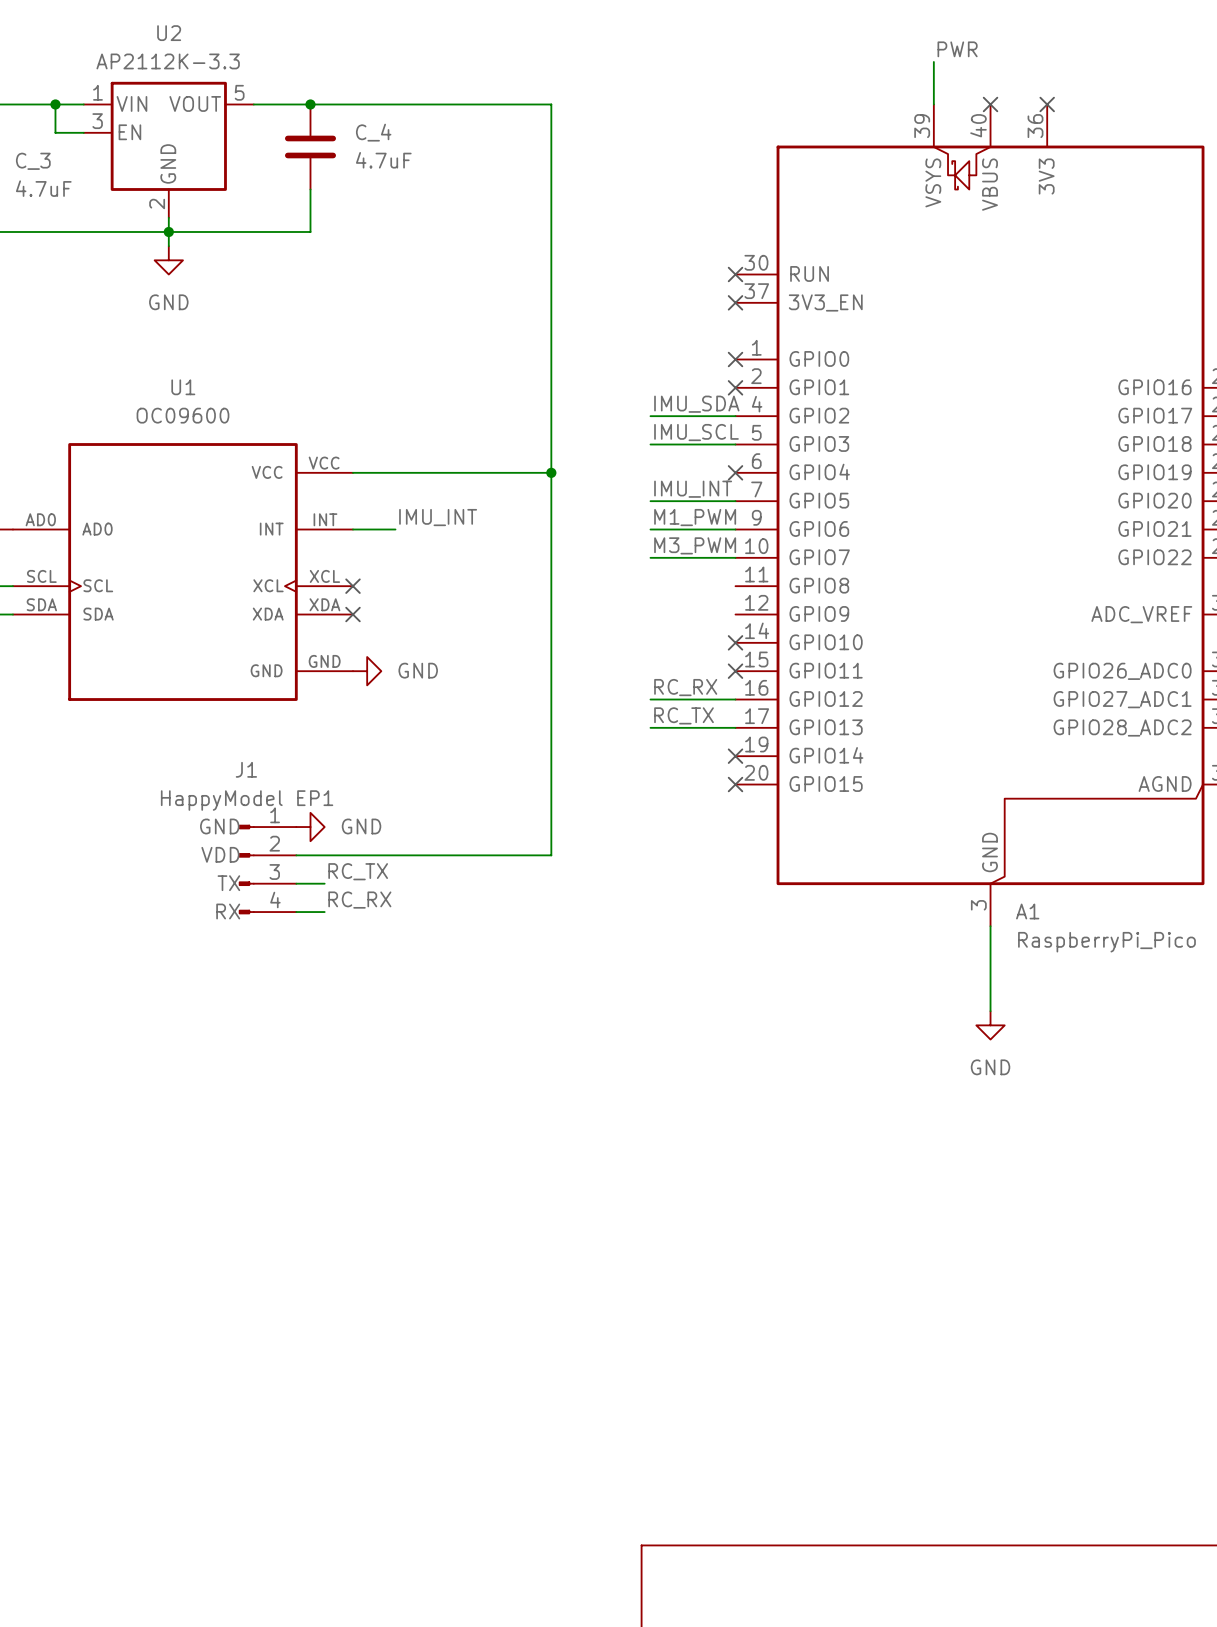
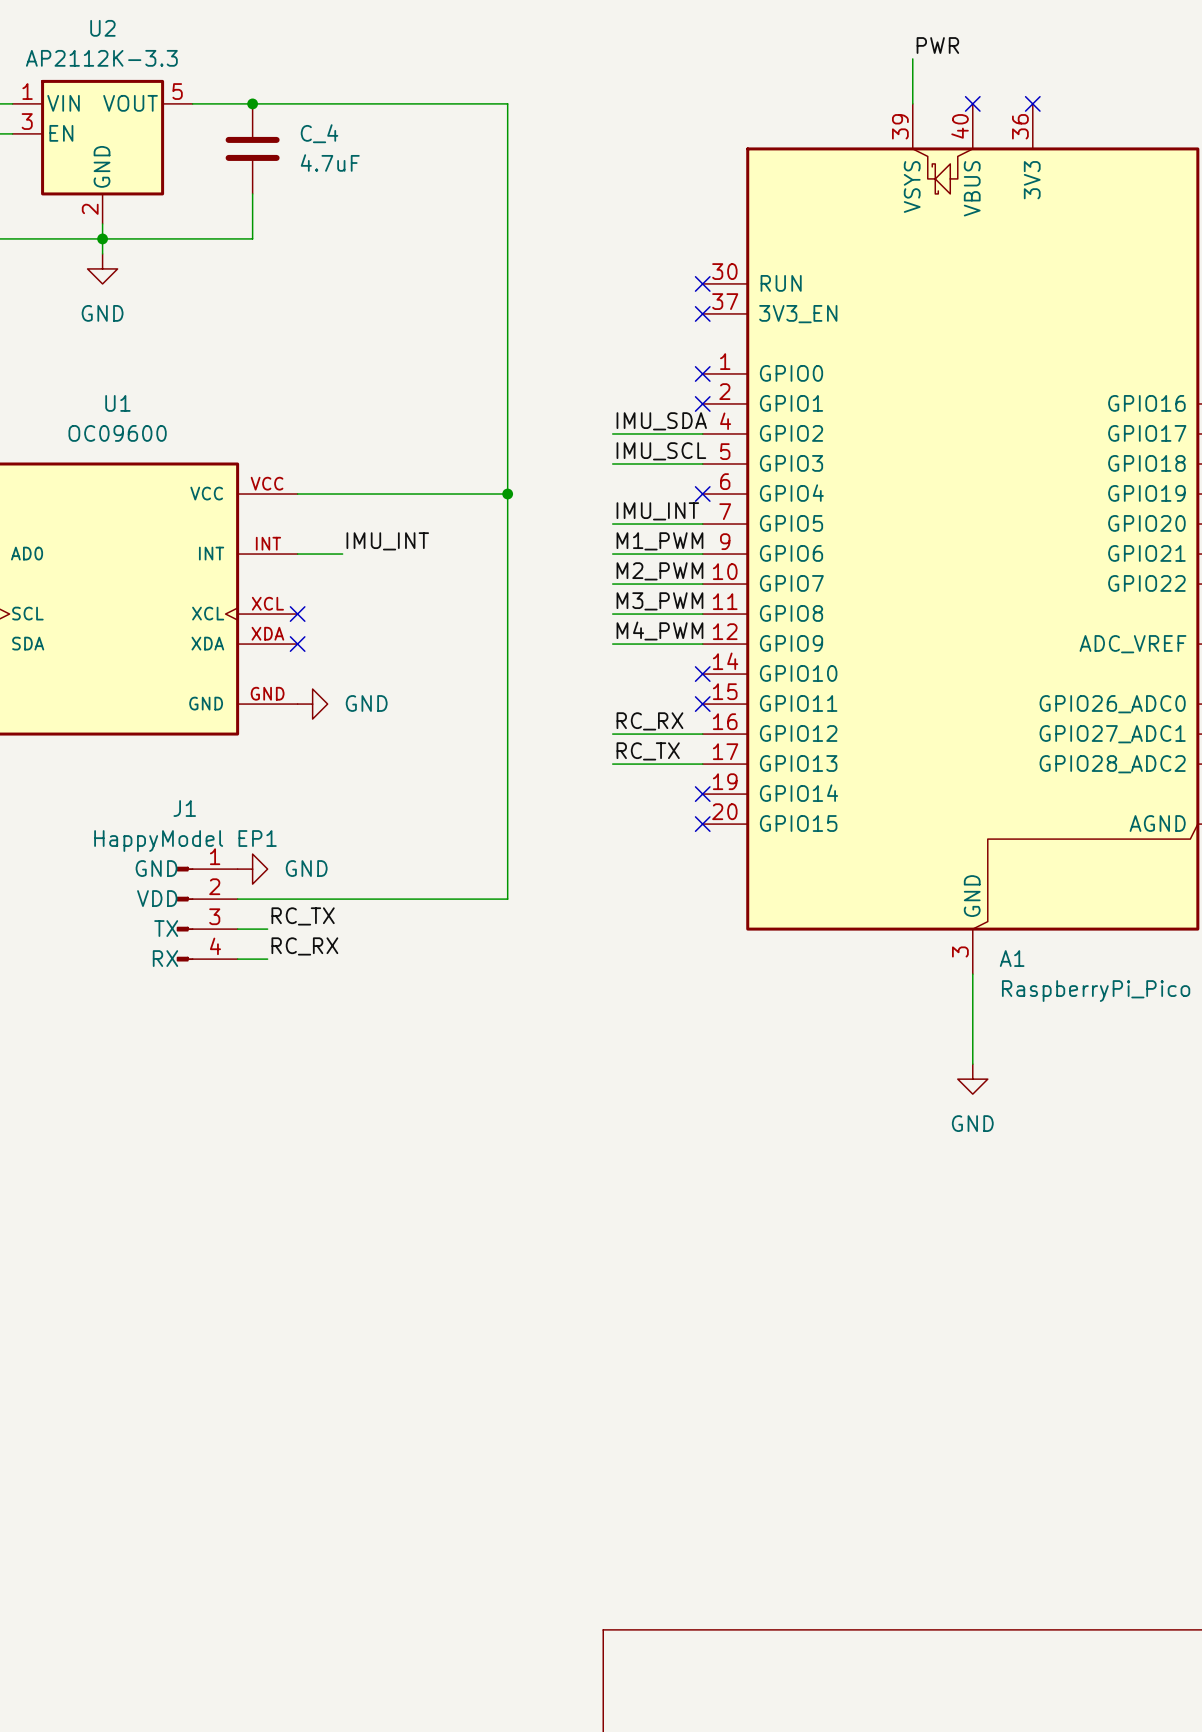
label: M3_PWM (695, 545) -> M2_PWM (659, 571)
label: none -> M3_PWM (659, 601)
wire: none -> (612, 614) (702, 614)
label: none -> M4_PWM (659, 631)
wire: none -> (612, 644) (702, 644)

